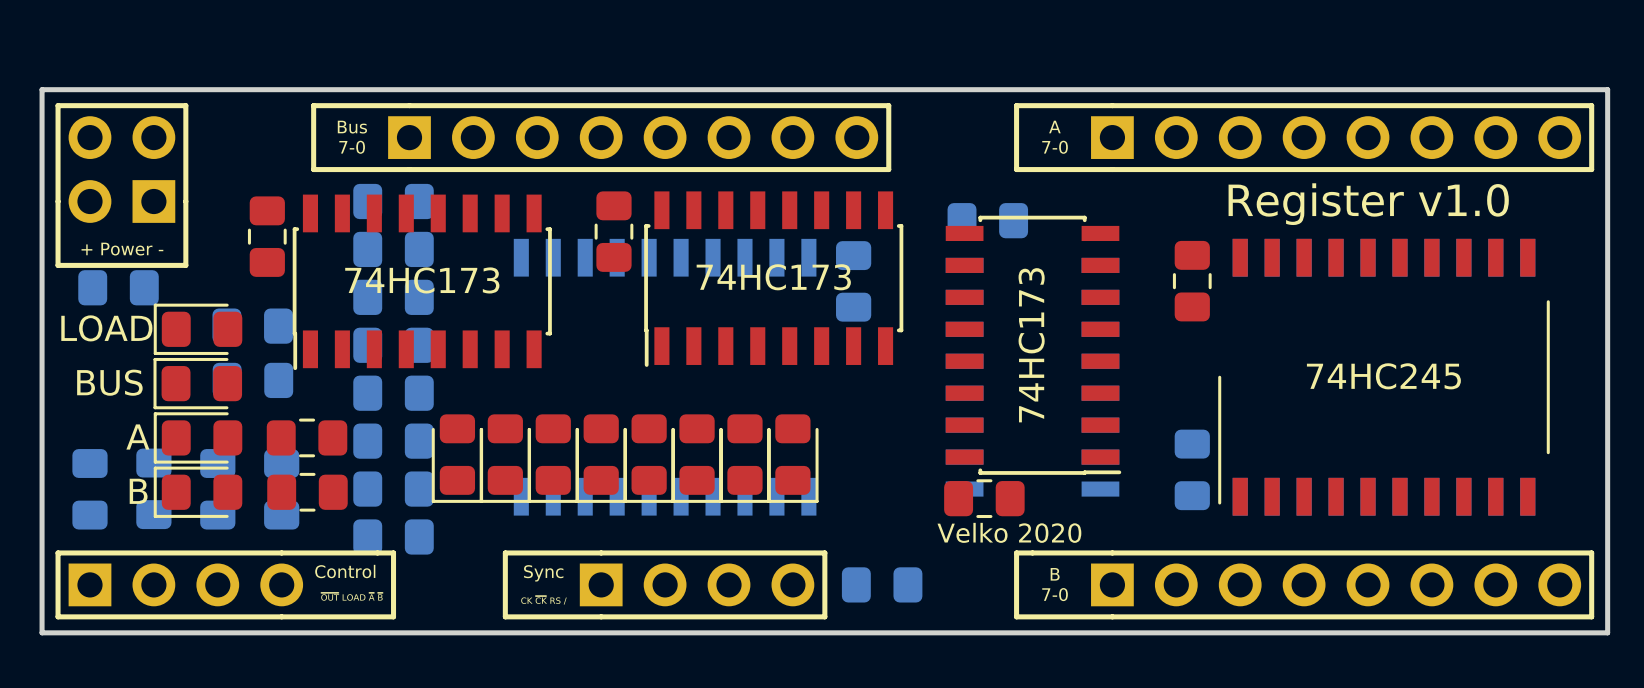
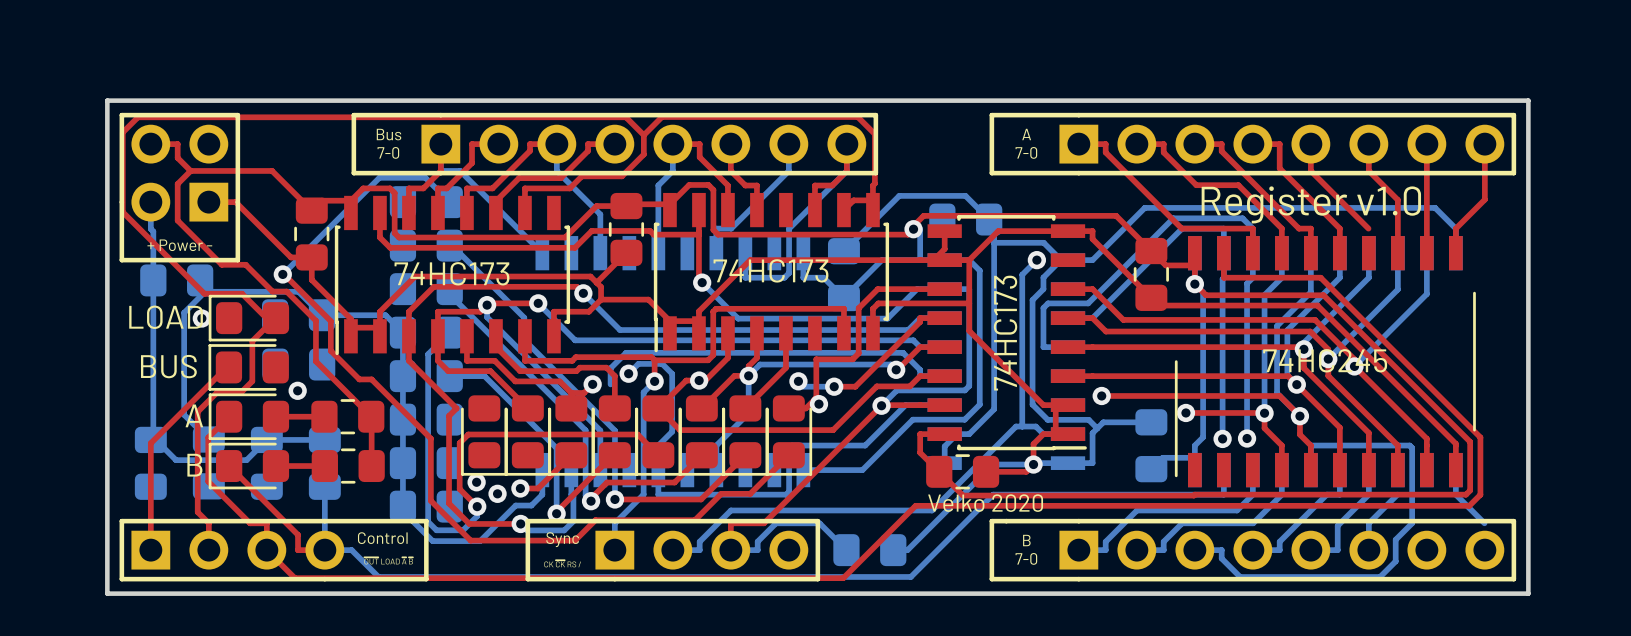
top track: none -> (643, 135) (625, 117) (137, 117) (122, 132) (122, 212) (204, 293) (242, 293) (270, 322)
top track: none -> (643, 135) (643, 154) (621, 176) (581, 176) (569, 188) (524, 188) (524, 212)
top track: none -> (643, 135) (662, 117) (857, 117) (874, 134) (872, 210)
top track: none -> (150, 144) (177, 144) (177, 157) (190, 170)
bottom track: none -> (440, 144) (440, 170) (460, 170) (542, 253)
top track: none -> (440, 144) (440, 170) (423, 188) (408, 188) (408, 212)
top track: none -> (498, 144) (472, 144) (472, 163) (446, 188) (437, 188) (437, 212)
bottom track: none -> (556, 144) (556, 170) (600, 214) (600, 253)
top track: none -> (556, 144) (530, 144) (530, 150) (492, 188) (466, 188) (466, 212)
top track: none -> (614, 144) (588, 144) (588, 150) (560, 178) (519, 178) (495, 201) (495, 212)
bottom track: none -> (672, 144) (672, 170) (658, 185) (658, 253)
top track: none -> (672, 144) (699, 144) (699, 157) (727, 185) (727, 210)
top track: none -> (730, 144) (730, 170) (745, 185) (756, 185) (756, 210)
bottom track: none -> (788, 144) (788, 170) (731, 228) (716, 228) (716, 253)
bottom track: none -> (846, 144) (846, 170) (789, 228) (789, 273) (784, 277) (745, 277) (745, 253)
top track: none -> (846, 144) (846, 170) (832, 185) (814, 185) (814, 210)
top track: none -> (1078, 144) (1105, 144) (1105, 152) (1181, 228) (1252, 228) (1252, 253)
top track: none -> (1136, 144) (1163, 144) (1163, 152) (1196, 185) (1238, 185) (1281, 228) (1281, 253)
top track: none -> (1194, 144) (1221, 144) (1221, 151) (1298, 228) (1310, 228) (1310, 253)
top track: none -> (1252, 144) (1279, 144) (1279, 168) (1339, 228) (1339, 253)
top track: none -> (1310, 144) (1310, 170) (1368, 228)
top track: none -> (1368, 144) (1368, 170) (1397, 199) (1397, 253)
top track: none -> (1426, 144) (1426, 253)
top track: none -> (1484, 144) (1484, 199) (1455, 228) (1455, 253)
top track: none -> (190, 170) (272, 170) (311, 210) (321, 200) (350, 200)
top track: none -> (190, 170) (177, 183) (177, 220) (221, 264) (245, 264) (272, 291) (286, 291) (315, 320) (315, 361) (371, 417) (371, 466)
top track: none -> (350, 200) (363, 188) (390, 188) (394, 193) (394, 233) (399, 237) (565, 237) (596, 206) (669, 204)
top track: none -> (872, 200) (853, 200) (843, 210)
bottom track: none -> (150, 202) (150, 228) (153, 231) (153, 437)
top track: none -> (208, 202) (235, 202) (290, 257) (311, 257) (311, 279) (350, 319) (350, 336)
bottom track: none -> (449, 202) (425, 177) (379, 177) (282, 274)
top track: none -> (669, 204) (689, 184) (708, 184) (713, 189) (713, 230) (718, 234) (908, 234) (923, 215) (1116, 215) (1165, 265) (1194, 265)
top track: none -> (698, 210) (698, 279) (702, 282)
top track: none -> (379, 212) (379, 237) (390, 247) (574, 247) (591, 230) (650, 230) (653, 234) (698, 234)
via: none -> (913, 229)
bottom track: none -> (920, 229) (920, 260)
top track: none -> (944, 231) (944, 249) (933, 260)
bottom track: none -> (994, 242) (1043, 242) (1059, 260) (1092, 260) (1144, 207) (1435, 207) (1455, 228) (1455, 253)
bottom track: none -> (449, 245) (452, 245) (524, 317) (524, 339) (614, 430) (614, 499)
bottom track: none -> (843, 251) (899, 195) (965, 195) (994, 224) (994, 409) (969, 434) (944, 434)
top track: none -> (626, 252) (596, 282)
bottom track: none -> (803, 253) (803, 277) (823, 277) (843, 298) (881, 260) (969, 260) (979, 270) (979, 404) (964, 419) (912, 419) (862, 470) (803, 470)
bottom track: none -> (1194, 253) (1194, 284) (1203, 292) (1203, 437) (1194, 445) (1194, 470)
top track: none -> (1194, 253) (1194, 284) (1206, 295) (1323, 295) (1470, 441) (1470, 490) (1466, 494) (962, 495) (920, 452) (920, 434) (944, 434)
top track: none -> (1223, 253) (1223, 277) (1320, 277) (1480, 437) (1480, 494) (1469, 505) (915, 505) (843, 578) (294, 578) (266, 550) (266, 523) (250, 523) (208, 481) (208, 437) (229, 416)
bottom track: none -> (1281, 253) (1281, 277) (1264, 295) (1264, 413)
bottom track: none -> (1310, 253) (1310, 292) (1277, 325) (1277, 393) (1299, 416)
bottom track: none -> (1339, 253) (1339, 277) (1287, 330) (1287, 375) (1296, 384)
bottom track: none -> (1368, 253) (1368, 277) (1303, 342) (1303, 349)
bottom track: none -> (1397, 253) (1397, 289) (1328, 359)
bottom track: none -> (1426, 253) (1426, 294) (1354, 366)
top track: none -> (969, 260) (969, 330) (1043, 405) (1068, 405)
top track: none -> (969, 260) (998, 231) (1092, 231) (1092, 239) (1159, 305) (1317, 305) (1455, 443) (1455, 470)
top track: none -> (969, 260) (750, 260) (698, 311) (698, 333)
bottom track: none -> (1036, 260) (1022, 274) (1022, 426)
via: none -> (1036, 260)
bottom track: none -> (1060, 260) (1043, 277) (1043, 289) (1032, 300) (1032, 404) (1047, 419) (1088, 419) (1097, 428)
top track: none -> (282, 274) (330, 321) (330, 350) (359, 379) (371, 379) (430, 438) (430, 500) (470, 540) (575, 540) (595, 520) (694, 520) (721, 493) (750, 493) (788, 455)
via: none -> (282, 274)
top track: none -> (596, 282) (590, 276) (415, 276) (379, 311) (379, 336)
top track: none -> (596, 282) (601, 287) (601, 299)
bottom track: none -> (702, 282) (738, 318) (887, 318) (917, 289) (969, 289) (969, 386) (964, 390) (896, 390) (881, 405)
via: none -> (702, 282)
via: none -> (1194, 284)
bottom track: none -> (449, 289) (449, 294) (585, 430) (585, 495) (591, 501)
top track: none -> (944, 289) (877, 289) (858, 308) (858, 353) (852, 359) (816, 359) (816, 397) (805, 408) (788, 408)
top track: none -> (1068, 289) (1092, 289) (1123, 319) (1315, 319) (1354, 359) (1354, 366) (1426, 438) (1426, 470)
bottom track: none -> (583, 293) (620, 330) (908, 330) (920, 318) (944, 318)
top track: none -> (583, 293) (576, 286) (433, 286) (408, 311) (408, 360) (456, 408) (449, 415) (449, 503) (469, 523) (520, 523)
via: none -> (583, 293)
top track: none -> (601, 299) (588, 311) (553, 311) (553, 336)
top track: none -> (601, 299) (648, 299) (669, 321)
bottom track: none -> (538, 303) (575, 340) (913, 340) (920, 347) (944, 347)
top track: none -> (538, 303) (488, 303) (480, 311) (437, 311) (437, 360) (448, 371) (490, 371) (527, 408)
via: none -> (538, 303)
top track: none -> (969, 303) (878, 303) (872, 308) (872, 333)
bottom track: none -> (487, 305) (487, 317) (600, 430) (600, 470)
via: none -> (487, 305)
via: none -> (201, 318)
top track: none -> (944, 318) (920, 318) (920, 321) (855, 386) (834, 386)
bottom track: none -> (1068, 318) (1092, 318) (1182, 228) (1223, 228) (1222, 438)
top track: none -> (1068, 318) (1092, 318) (1105, 331) (1310, 331) (1328, 349) (1328, 375) (1397, 445) (1397, 470)
top track: none -> (669, 321) (698, 322)
top track: none -> (270, 322) (252, 341) (252, 381) (241, 392) (217, 392) (197, 411) (197, 512) (208, 523) (208, 550)
top track: none -> (350, 327) (379, 327)
bottom track: none -> (449, 332) (428, 354) (428, 521) (436, 530) (463, 530) (477, 516) (477, 506)
top track: none -> (727, 333) (727, 357) (705, 380) (686, 380) (658, 408) (680, 430) (833, 430) (876, 386) (909, 386) (920, 376) (944, 376)
top track: none -> (756, 333) (756, 357) (748, 366) (748, 375) (734, 375) (701, 408)
top track: none -> (785, 333) (785, 367) (745, 408)
top track: none -> (843, 333) (843, 308) (716, 308) (713, 311) (713, 355) (708, 360) (654, 360)
top track: none -> (466, 336) (466, 360) (494, 360) (515, 381) (559, 381) (571, 393)
top track: none -> (495, 336) (495, 346) (520, 371) (576, 371) (579, 367) (606, 367) (614, 376) (614, 408)
top track: none -> (524, 336) (524, 360) (572, 360) (575, 357) (651, 357) (654, 360)
top track: none -> (944, 347) (920, 347) (896, 369)
bottom track: none -> (1068, 347) (1043, 347) (1043, 308) (1048, 303) (1088, 303) (1173, 218) (1242, 218) (1252, 228) (1252, 277) (1247, 283) (1247, 438)
top track: none -> (1068, 347) (1301, 347) (1303, 349) (1303, 368) (1368, 433) (1368, 470)
via: none -> (1303, 349)
via: none -> (1328, 359)
top track: none -> (654, 360) (654, 381)
via: none -> (1354, 366)
top track: none -> (228, 367) (226, 367) (150, 443) (150, 550)
bottom track: none -> (896, 369) (890, 364) (760, 364) (748, 375) (748, 413) (716, 445) (716, 470)
via: none -> (896, 369)
bottom track: none -> (628, 373) (638, 363) (662, 363) (672, 373) (672, 431) (658, 445) (658, 494) (786, 494) (789, 491) (789, 448) (791, 445) (865, 445) (905, 405) (944, 405)
via: none -> (628, 373)
via: none -> (748, 375)
bottom track: none -> (449, 376) (484, 376) (556, 448) (556, 513)
bottom track: none -> (944, 376) (920, 376) (920, 369) (903, 352) (626, 352) (610, 368) (610, 384)
top track: none -> (1068, 376) (1288, 376) (1339, 427) (1339, 470)
via: none -> (699, 380)
via: none -> (798, 381)
bottom track: none -> (654, 381) (643, 392) (643, 494) (614, 523) (614, 550)
via: none -> (654, 381)
top track: none -> (592, 384) (584, 393) (571, 393)
via: none -> (592, 384)
via: none -> (1296, 384)
bottom track: none -> (803, 386) (834, 386)
via: none -> (834, 386)
via: none -> (297, 390)
top track: none -> (1101, 395) (1279, 395) (1299, 416) (1299, 434) (1310, 445) (1310, 470)
via: none -> (1101, 395)
via: none -> (818, 404)
via: none -> (881, 405)
top track: none -> (944, 405) (882, 405) (764, 523) (730, 523) (730, 550)
top track: none -> (1055, 405) (1055, 434)
top track: none -> (1185, 412) (1264, 412)
via: none -> (1185, 412)
top track: none -> (1264, 413) (1264, 428) (1281, 445) (1281, 470)
via: none -> (1264, 413)
top track: none -> (275, 416) (324, 416)
via: none -> (1299, 416)
bottom track: none -> (1151, 422) (1103, 422) (1092, 433) (1092, 463) (993, 464) (907, 550) (893, 550)
bottom track: none -> (956, 434) (944, 446) (944, 463)
bottom track: none -> (1068, 434) (1043, 434) (1035, 426) (1016, 426) (932, 510) (730, 510) (699, 541) (699, 550) (672, 550)
top track: none -> (1068, 434) (1043, 434) (1033, 444) (1033, 464) (1026, 471) (986, 471)
bottom track: none -> (153, 437) (176, 460) (246, 460) (266, 439) (324, 439)
via: none -> (1247, 438)
via: none -> (1222, 438)
bottom track: none -> (208, 439) (184, 414) (184, 312) (208, 288) (211, 291) (298, 291) (321, 315) (385, 315) (402, 332) (402, 511) (432, 541) (480, 541) (515, 505) (531, 505) (542, 494) (542, 470)
top track: none -> (571, 455) (538, 488) (520, 488)
top track: none -> (614, 455) (556, 513)
top track: none -> (658, 455) (637, 434) (468, 434) (459, 443) (459, 489) (477, 506)
top track: none -> (701, 455) (674, 482) (607, 482) (591, 498) (591, 501)
top track: none -> (745, 455) (701, 499) (614, 499)
bottom track: none -> (1194, 457) (1162, 457) (1151, 469)
via: none -> (1033, 464)
top track: none -> (229, 466) (298, 534) (298, 550) (324, 550)
top track: none -> (275, 466) (324, 466)
bottom track: none -> (571, 470) (573, 521) (564, 530) (527, 530) (520, 523)
bottom track: none -> (1223, 470) (1223, 494) (993, 494) (910, 576) (378, 576) (351, 550) (324, 550) (324, 486)
bottom track: none -> (1252, 470) (1252, 494) (1237, 510) (1136, 510) (1105, 541) (1105, 550) (1078, 550)
bottom track: none -> (1281, 470) (1281, 494) (1253, 523) (1182, 523) (1163, 541) (1163, 550) (1136, 550)
bottom track: none -> (1310, 470) (1310, 445) (1409, 445) (1412, 447) (1412, 523) (1395, 539) (1395, 561) (1380, 577) (1240, 577) (1221, 558) (1221, 550) (1194, 550)
bottom track: none -> (1339, 470) (1339, 494) (1326, 494) (1279, 541) (1279, 550) (1252, 550)
bottom track: none -> (1368, 470) (1368, 494) (1337, 525) (1337, 550) (1310, 550)
bottom track: none -> (1455, 470) (1455, 494) (1484, 523)
via: none -> (476, 482)
via: none -> (520, 488)
via: none -> (497, 493)
bottom track: none -> (1397, 494) (1368, 523) (1368, 550)
via: none -> (614, 499)
via: none -> (591, 501)
via: none -> (477, 506)
via: none -> (556, 513)
via: none -> (520, 523)
bottom track: none -> (730, 550) (757, 550) (757, 541) (776, 523) (819, 523) (846, 550)

